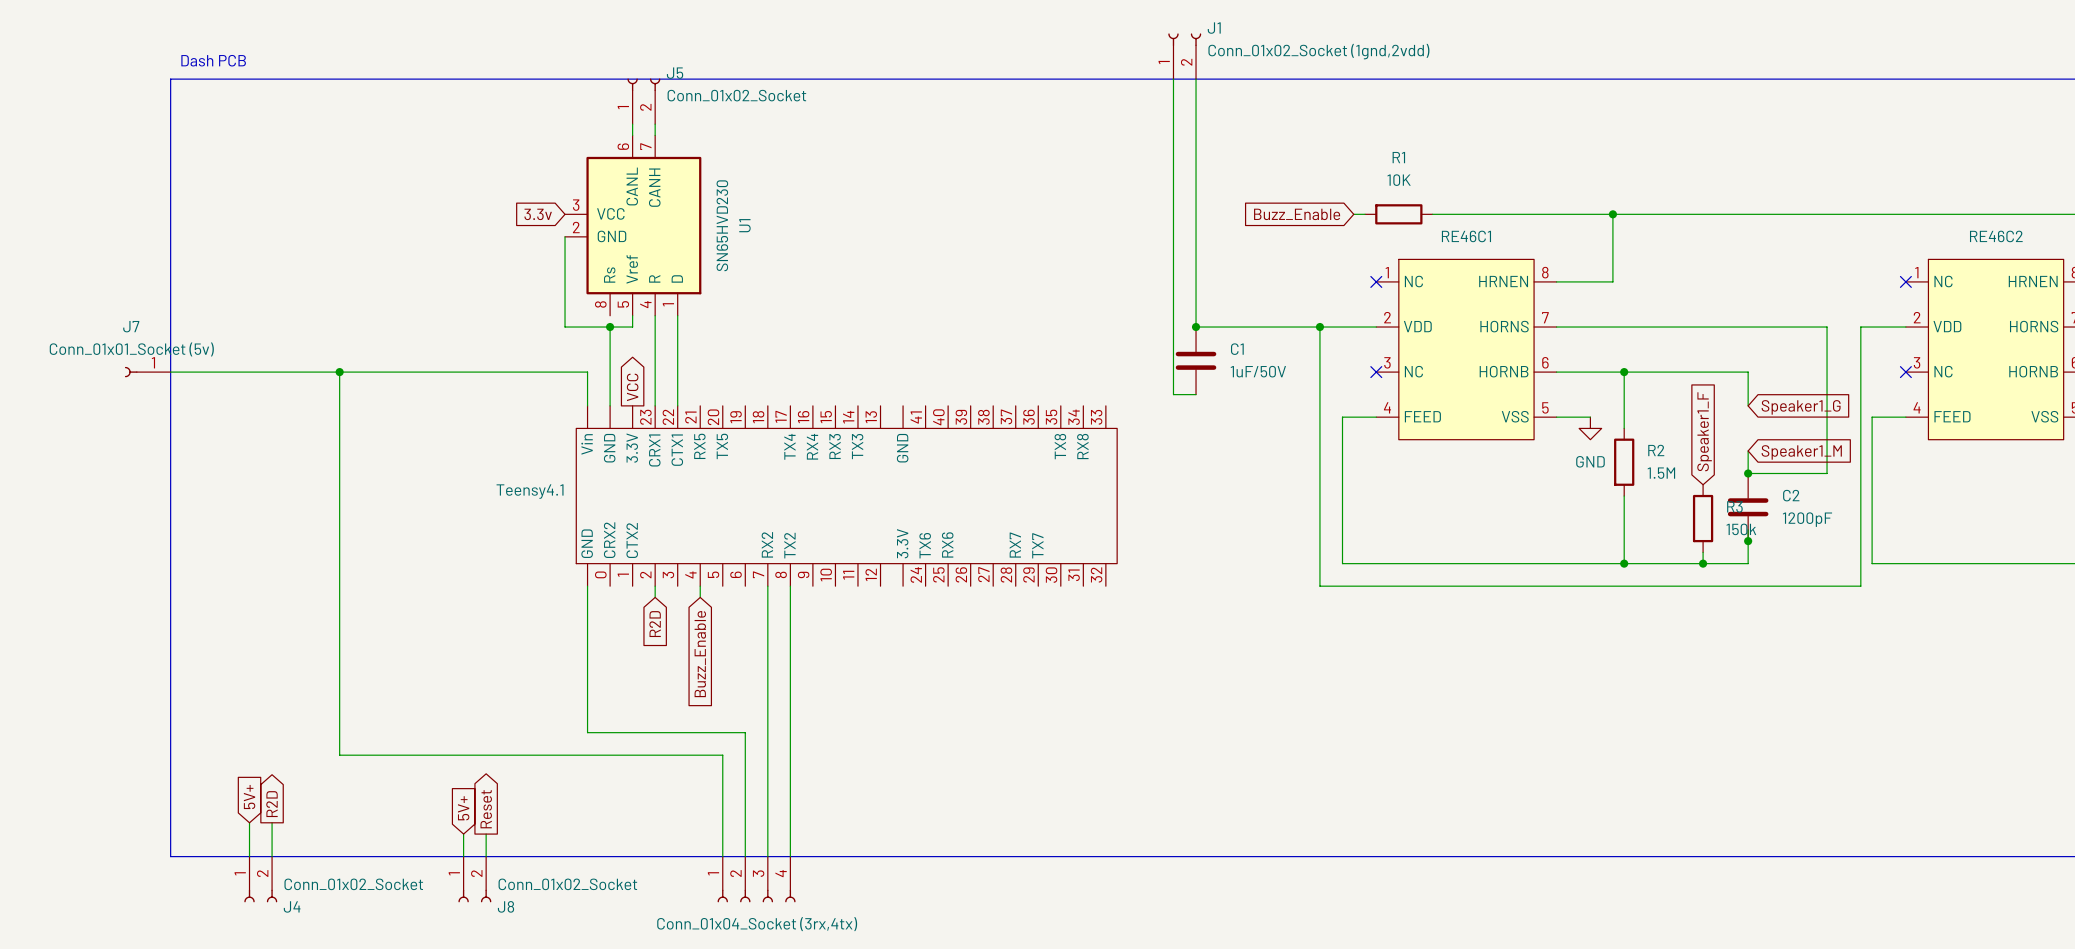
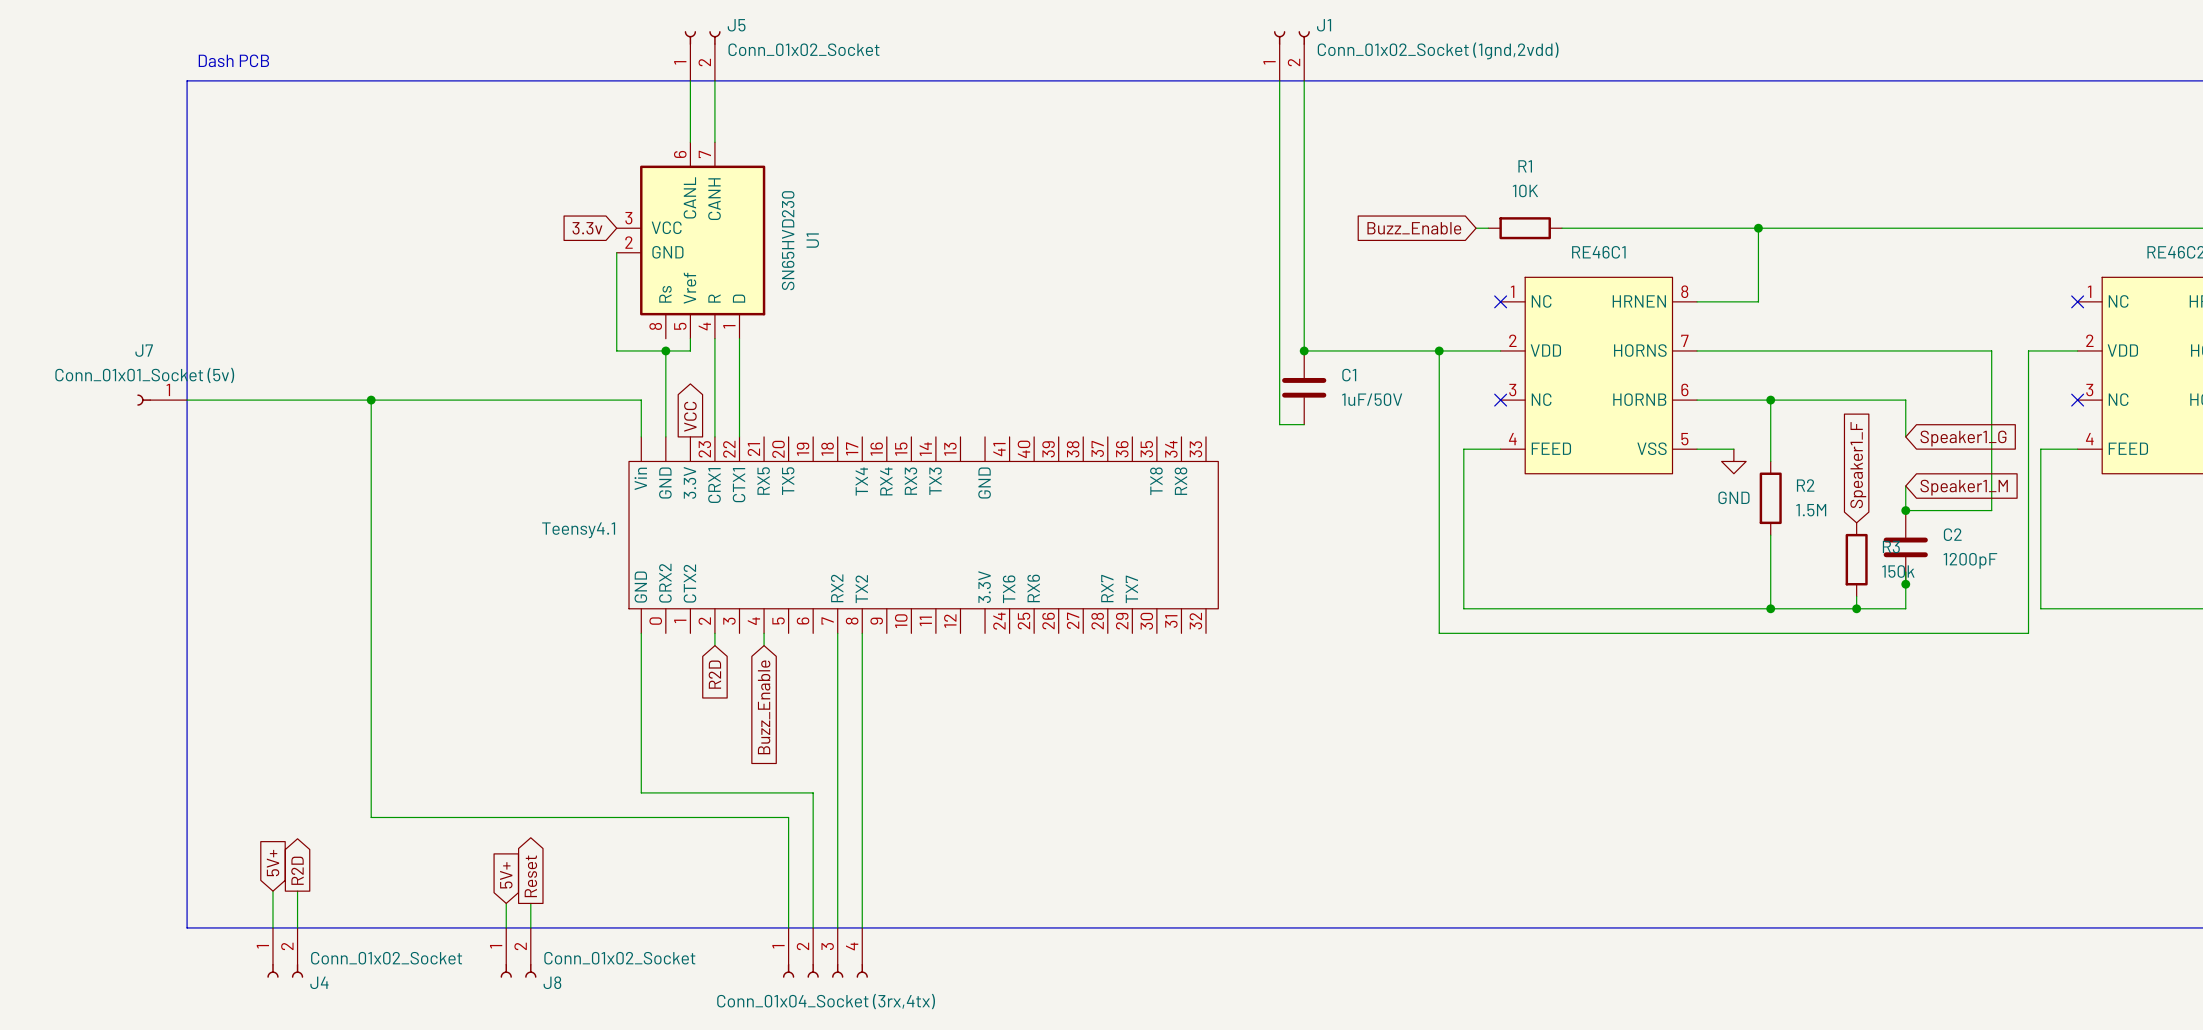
J5 position: (643, 101) -> (702, 55)

